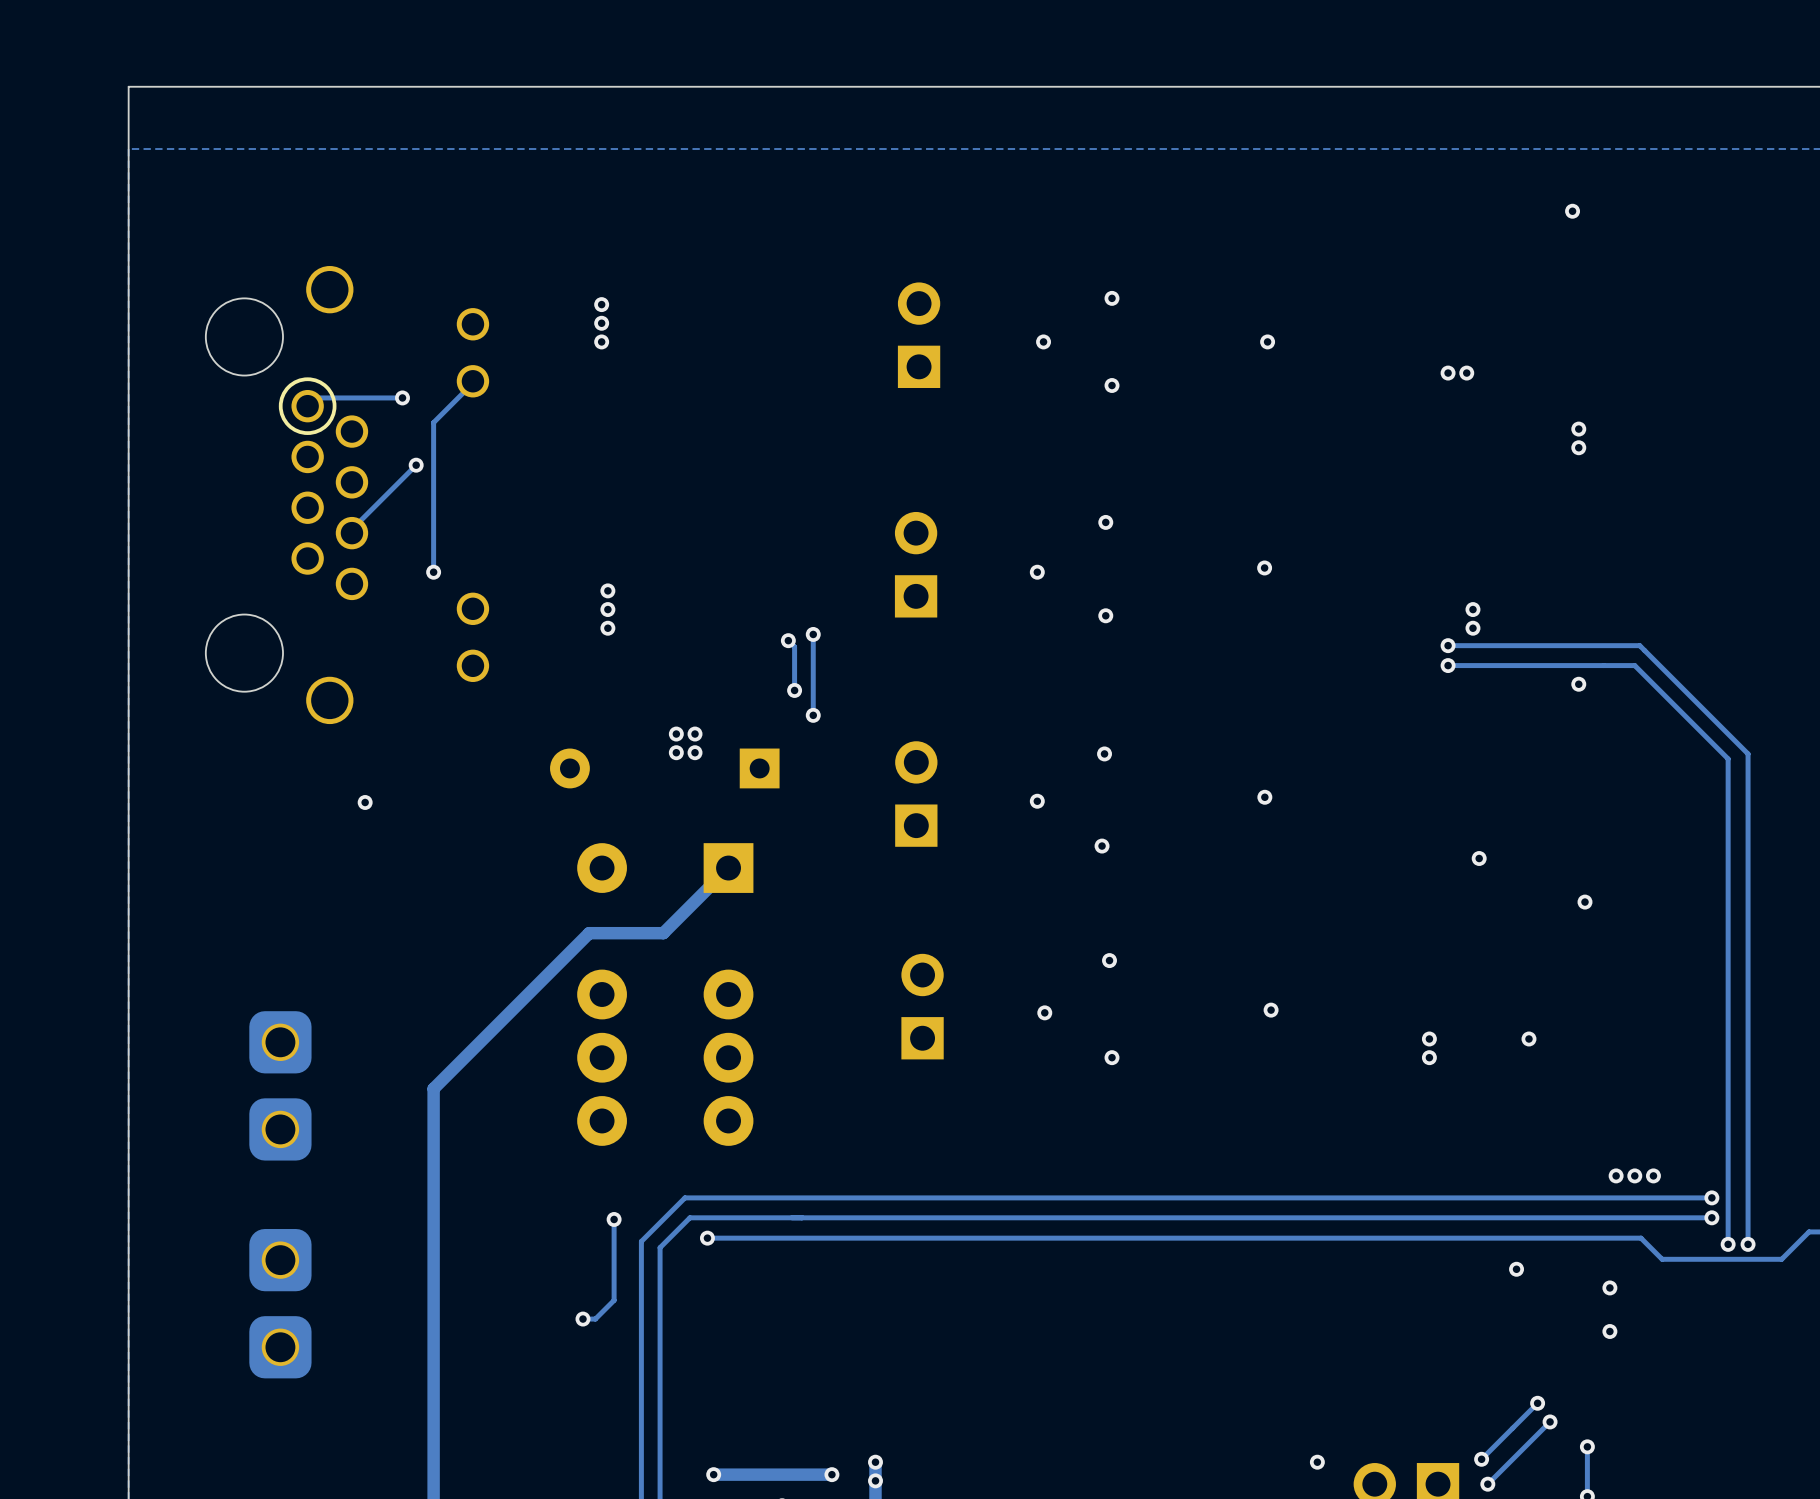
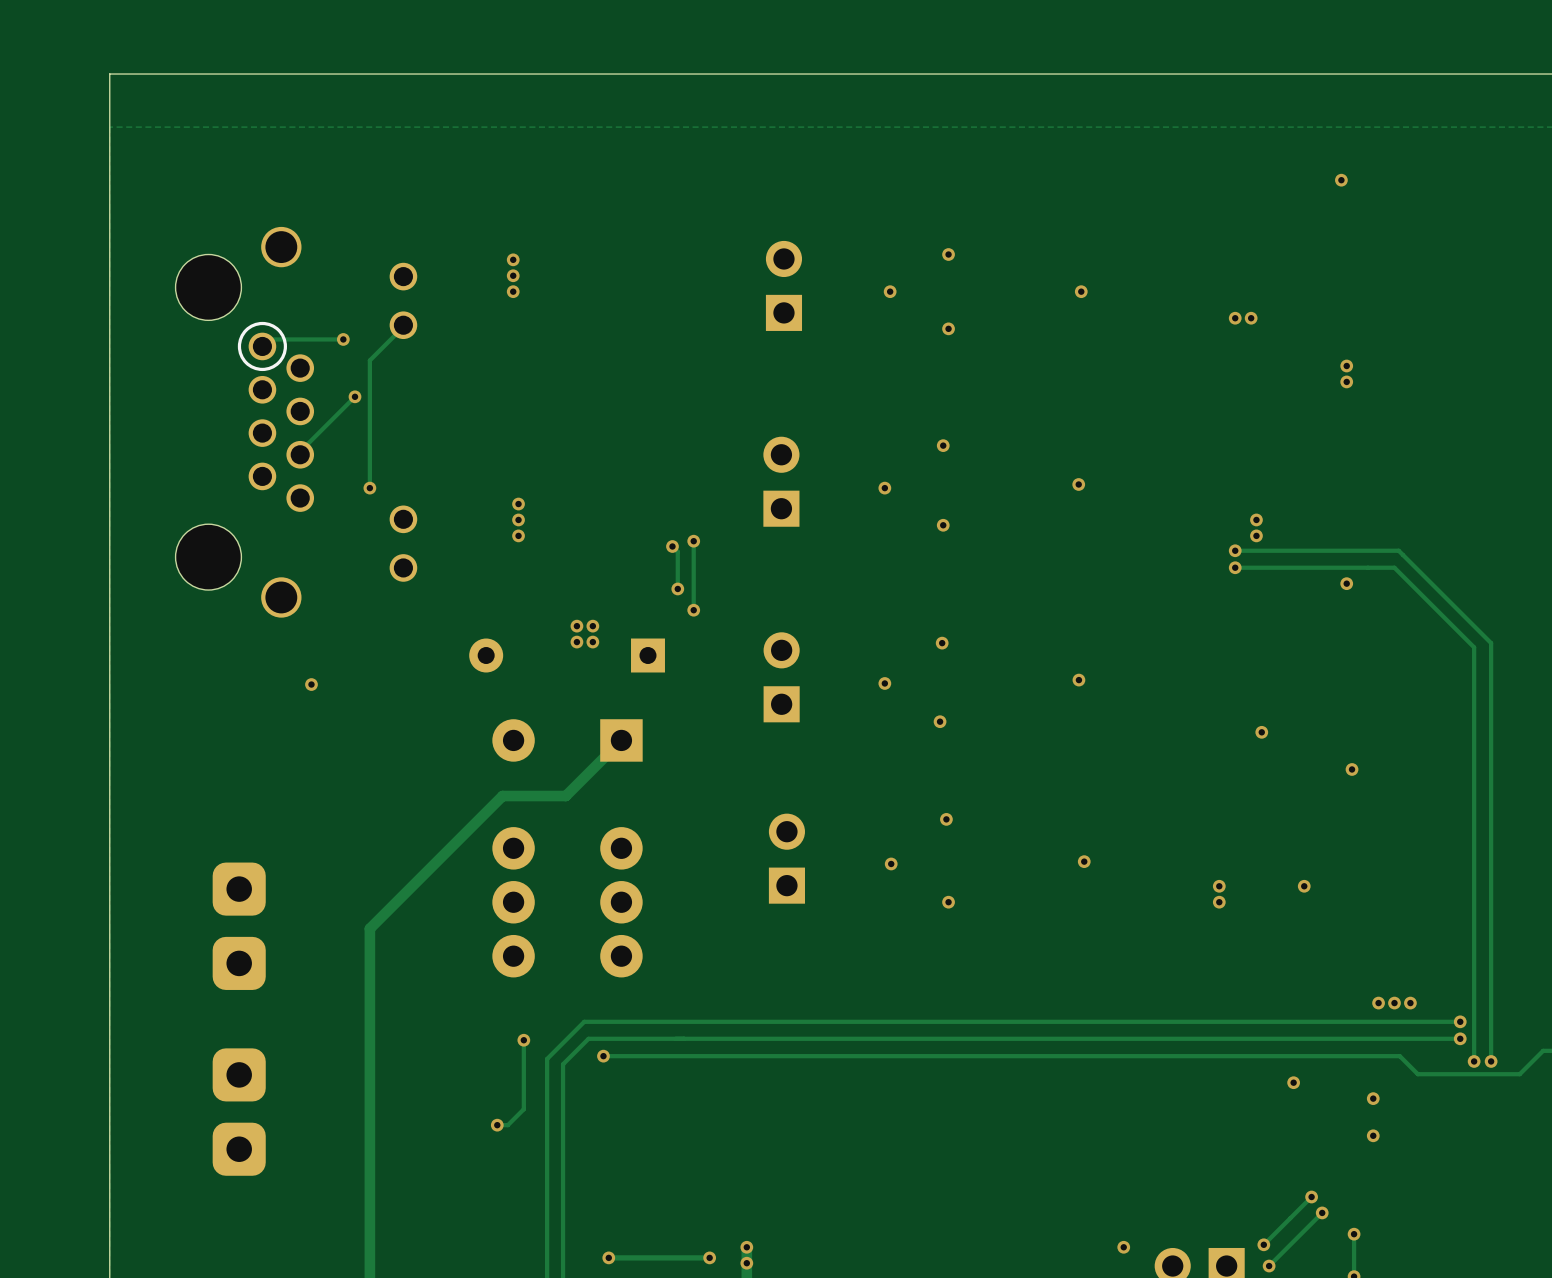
track width: thick (831, 1474) (713, 1474) -> thin (709, 1257) (608, 1257)

